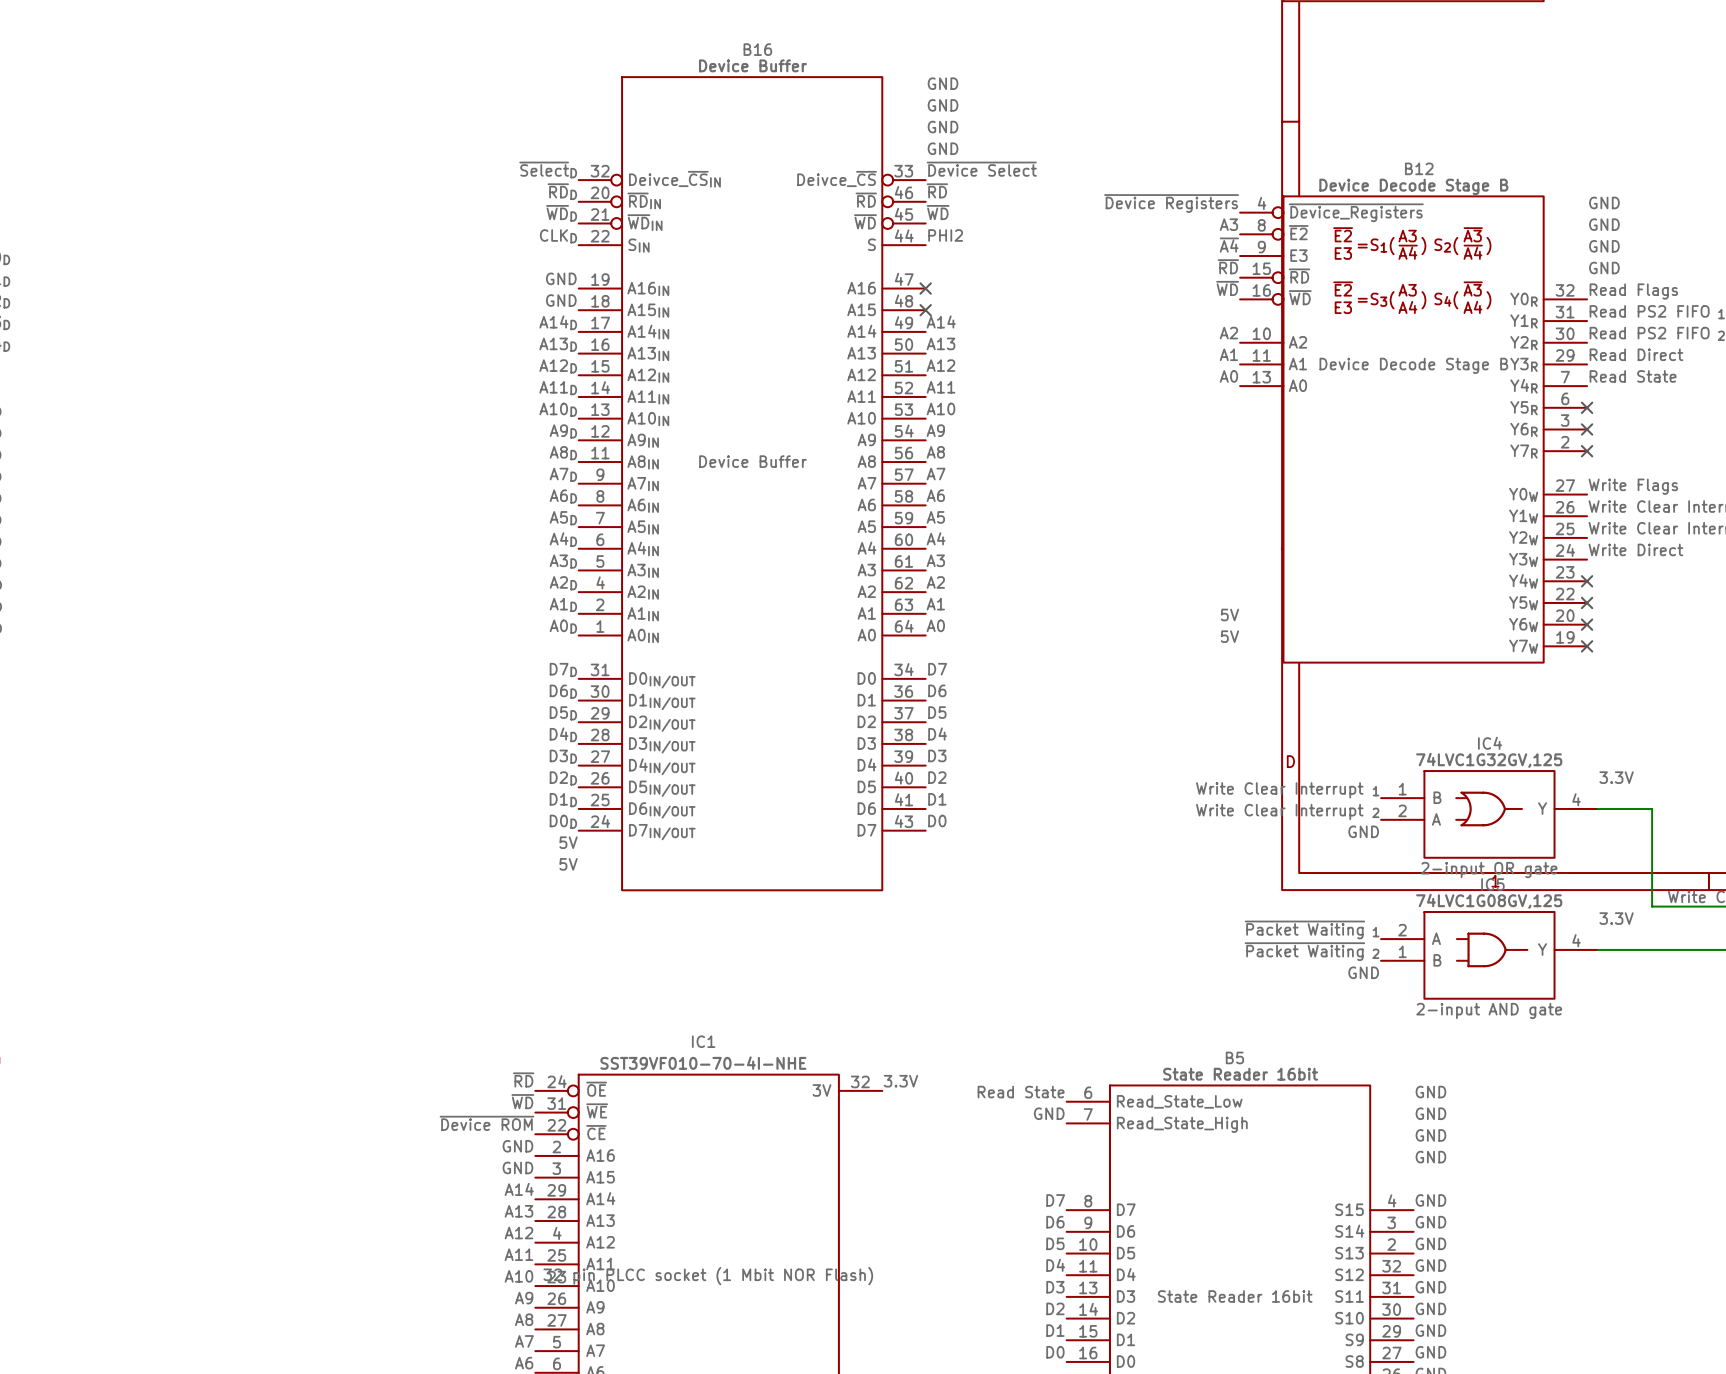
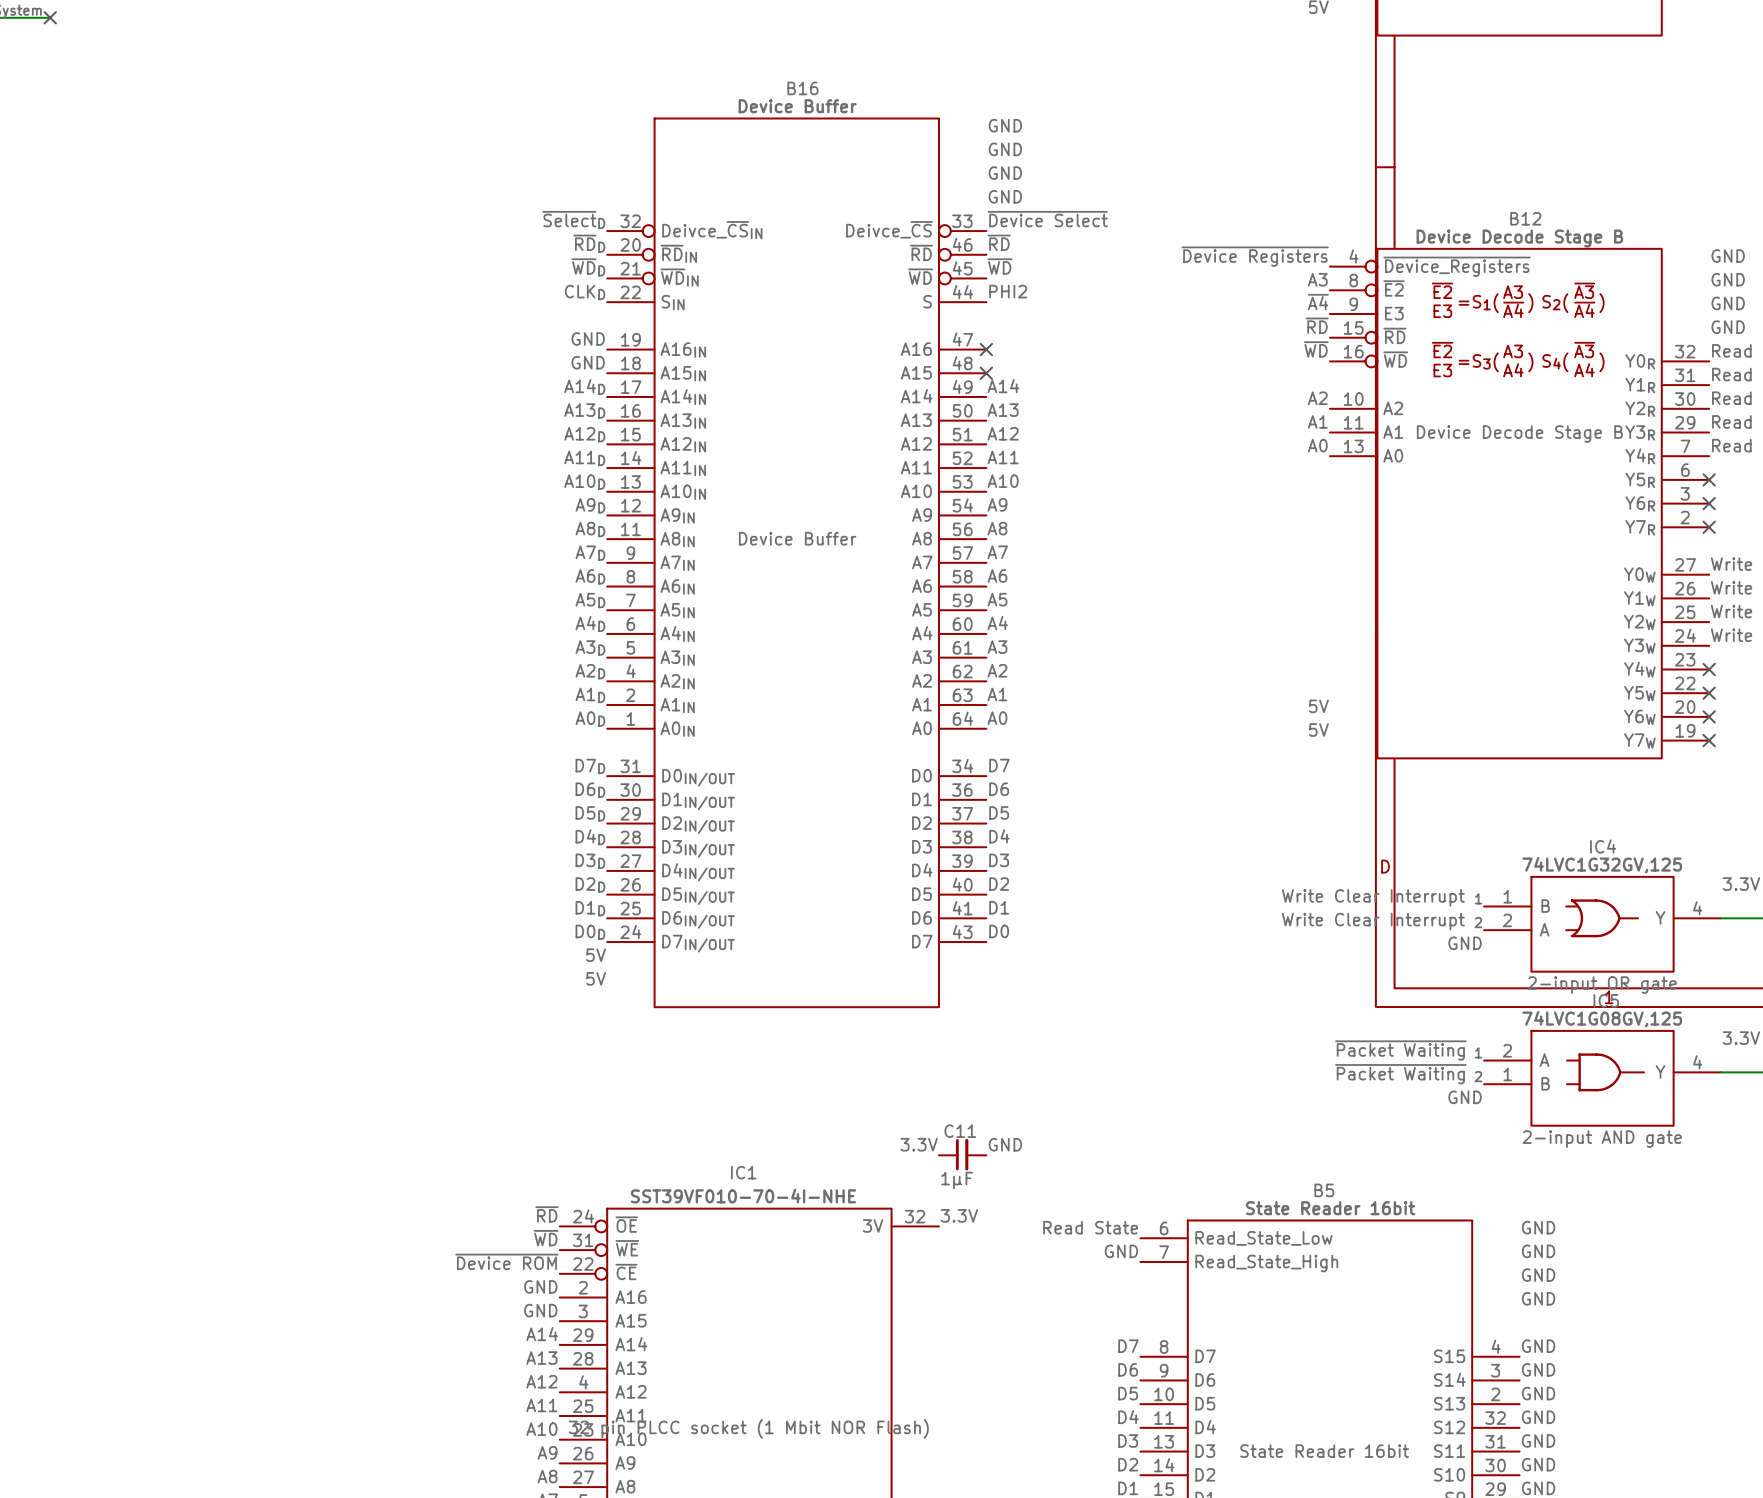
label: none -> 3.3V (919, 1144)
label: none -> GND (1005, 1144)
C11: none -> 1µF (962, 1154)

